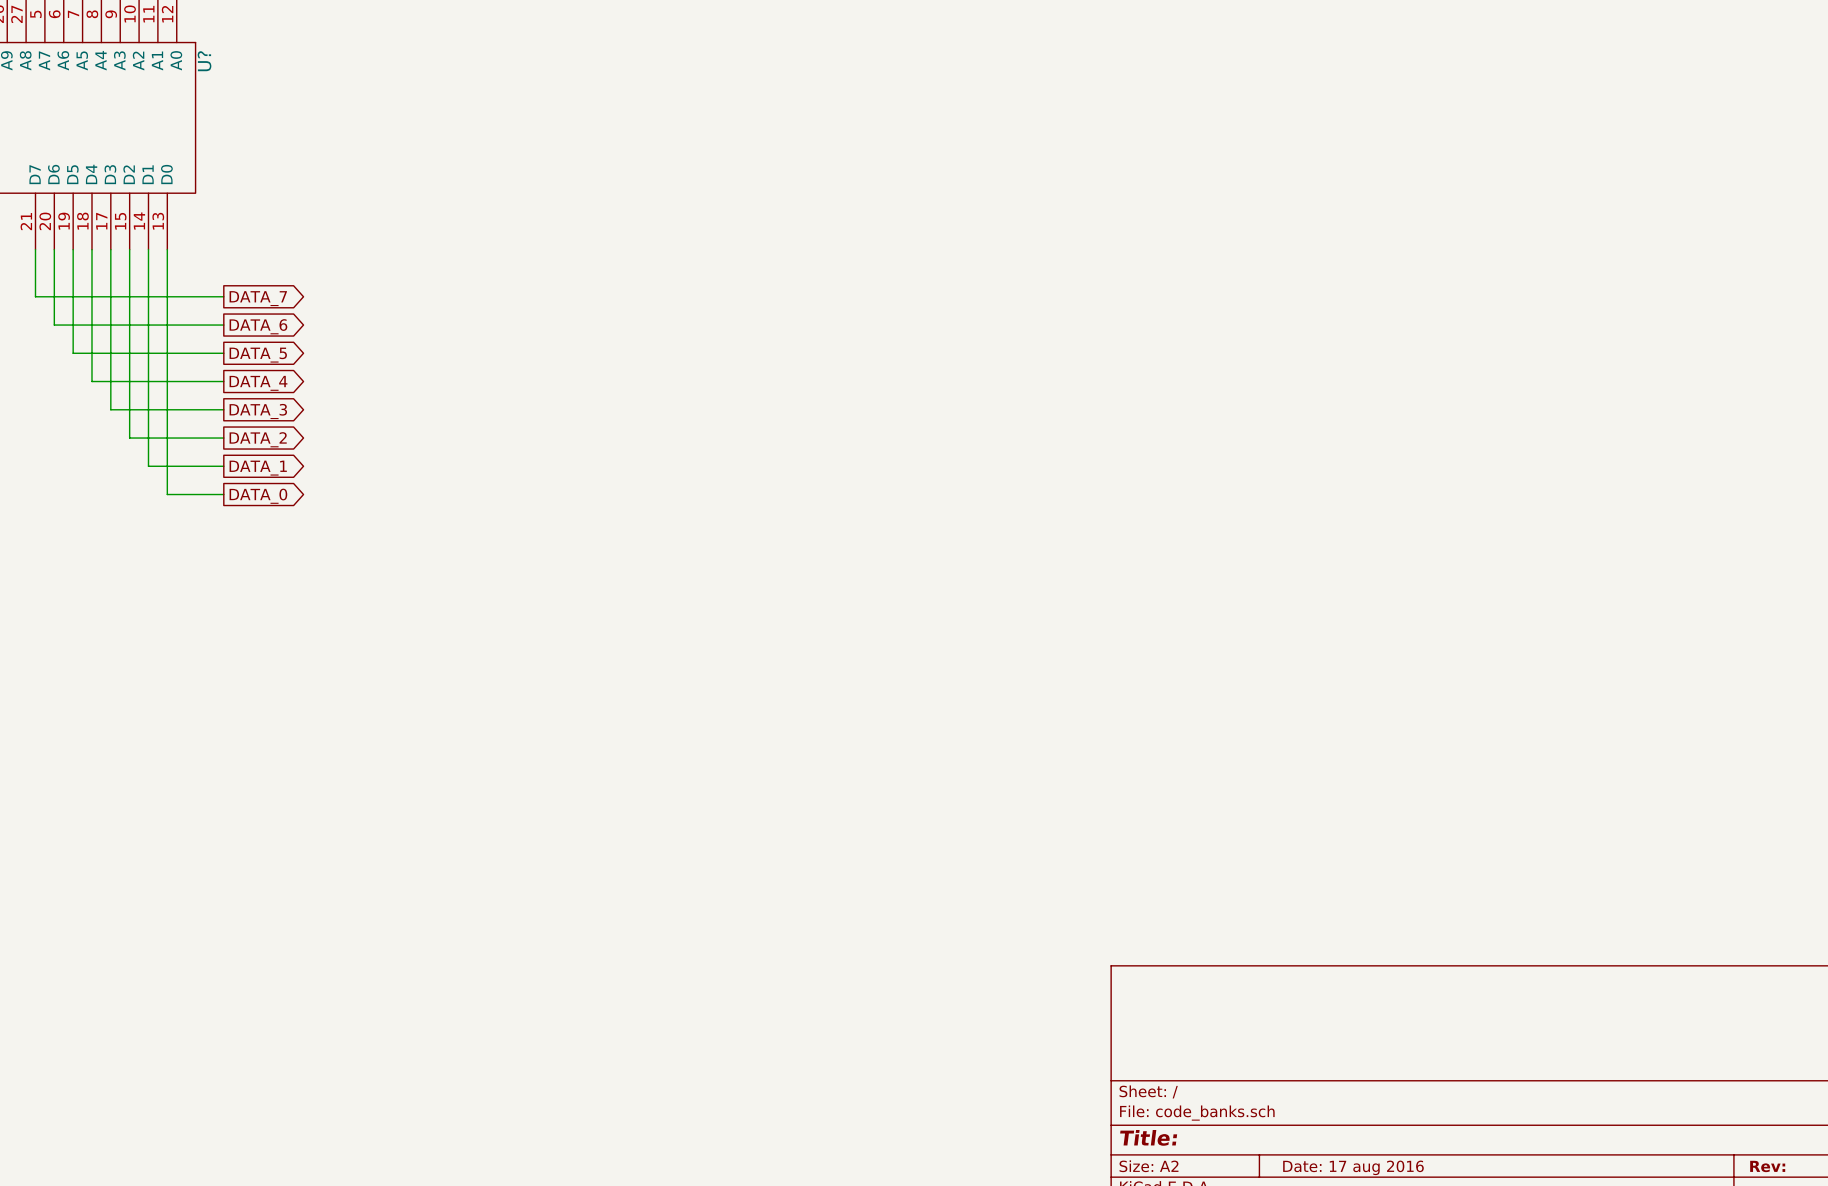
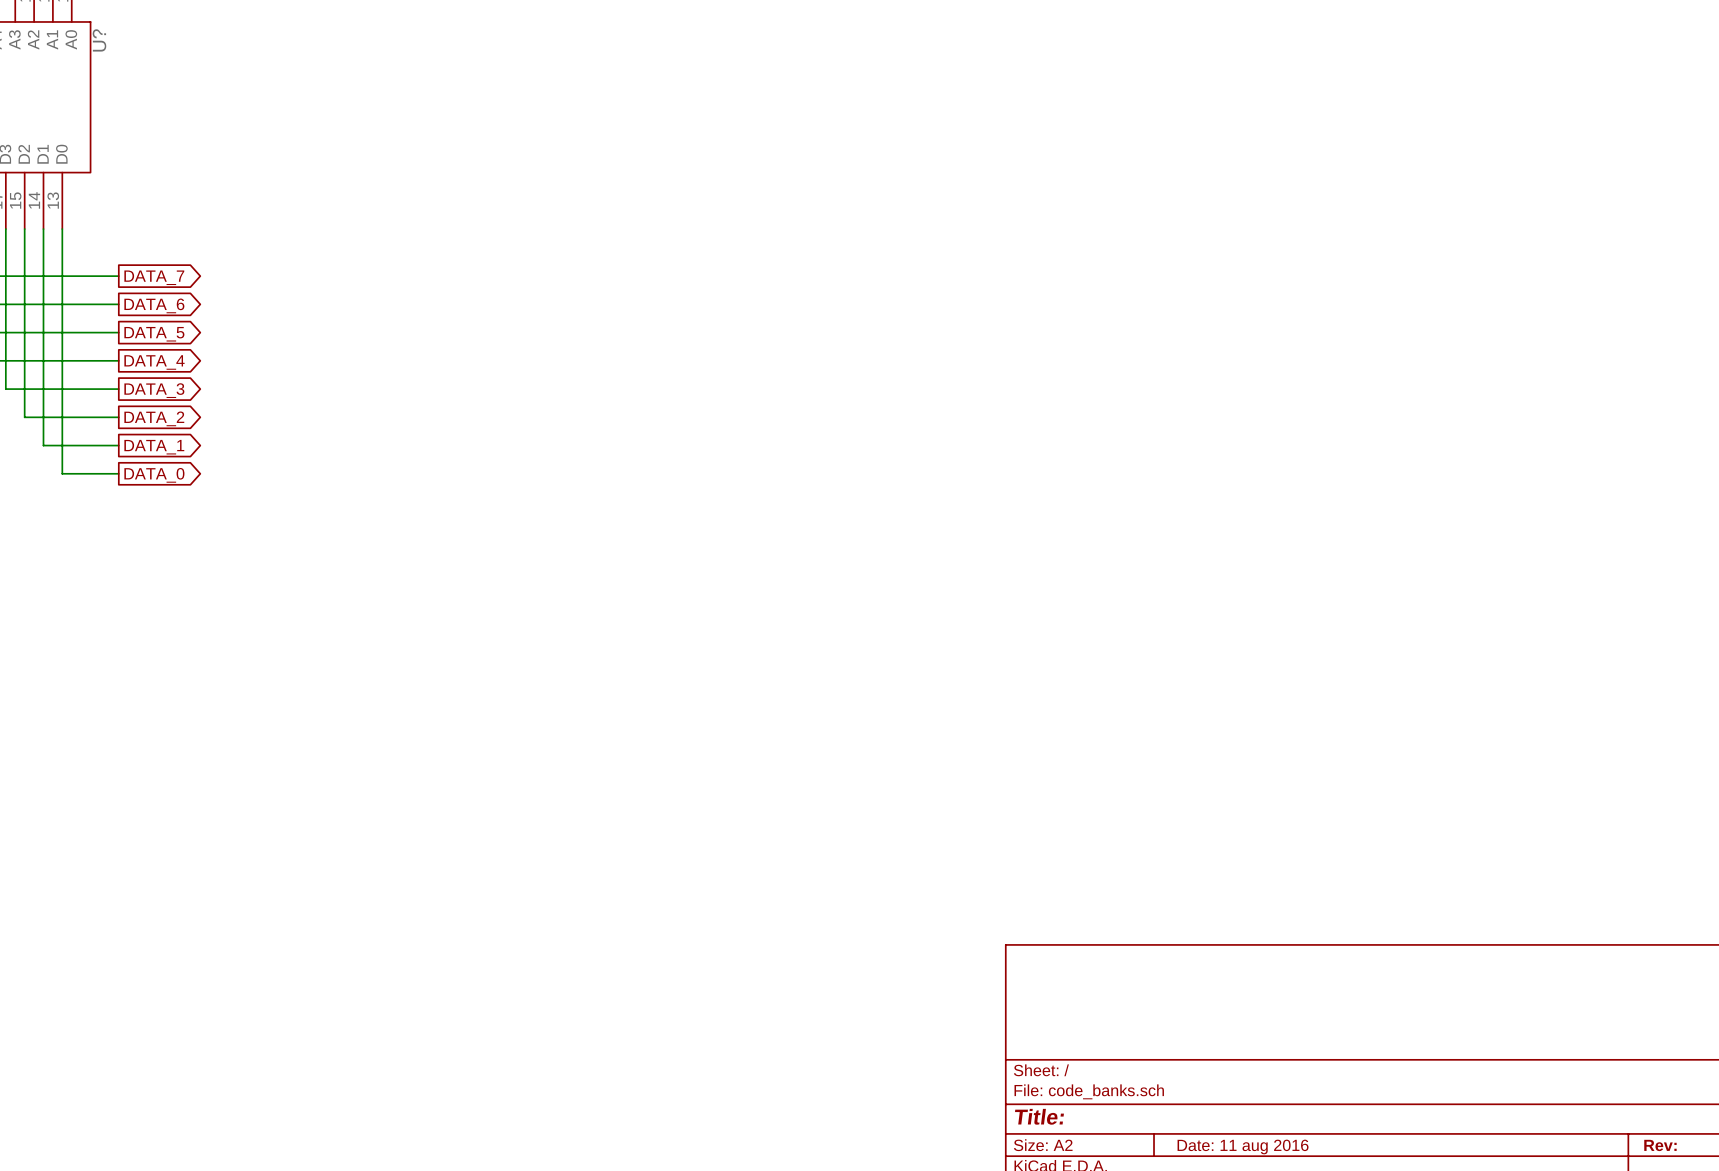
title block: Date: 17 aug 2016 (1353, 1167) -> Date: 11 aug 2016 (1243, 1146)

